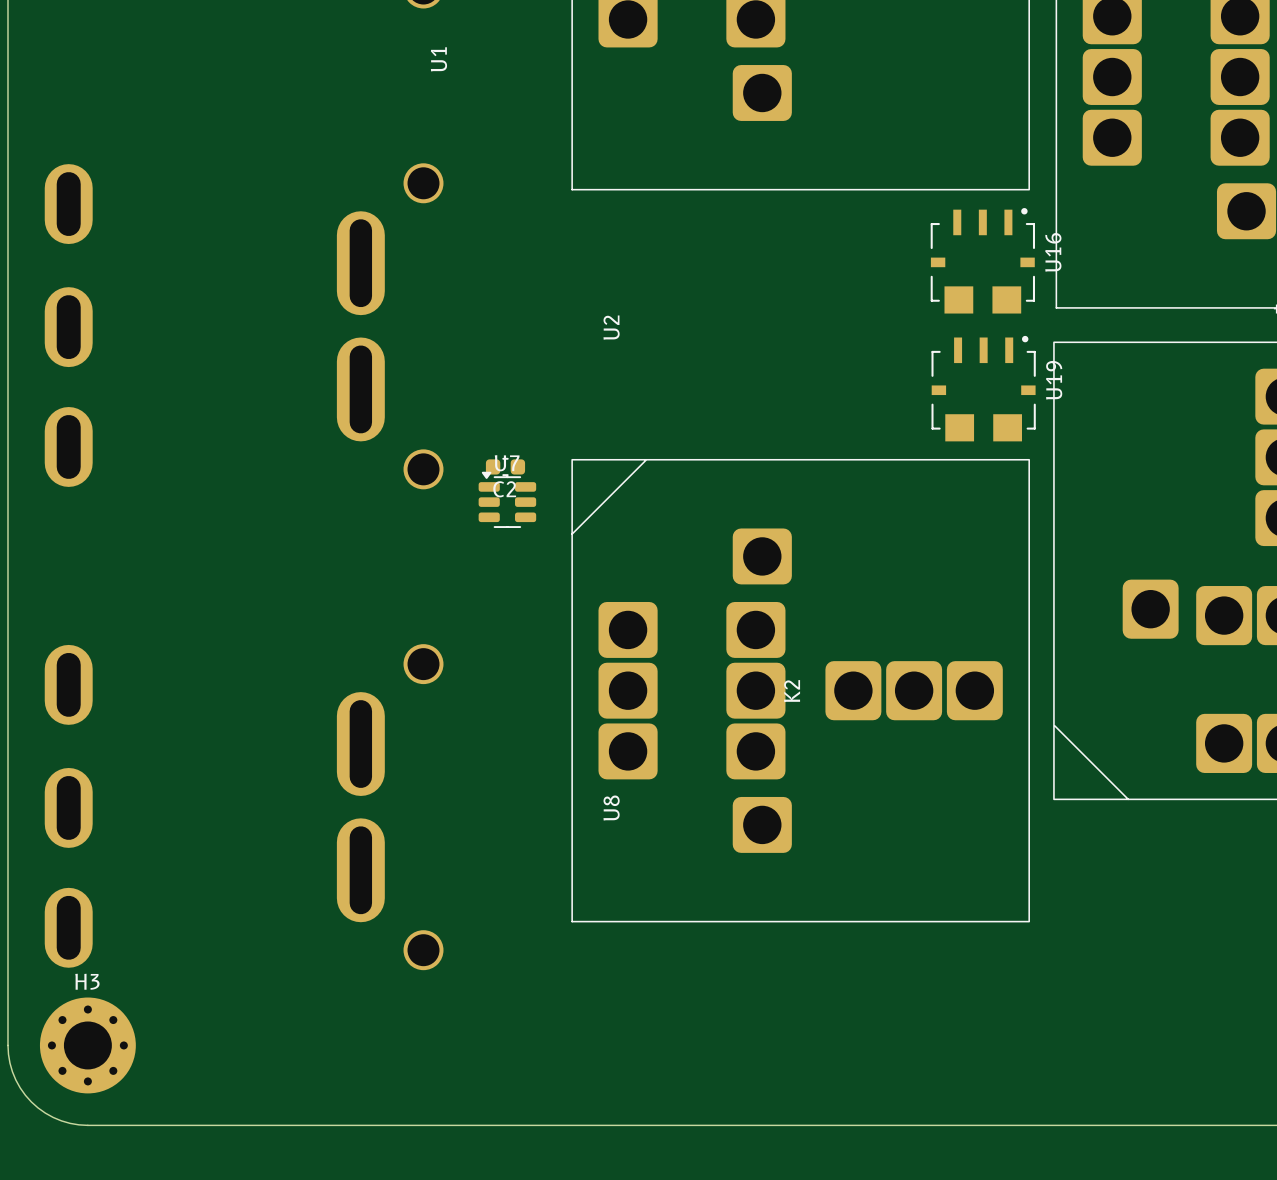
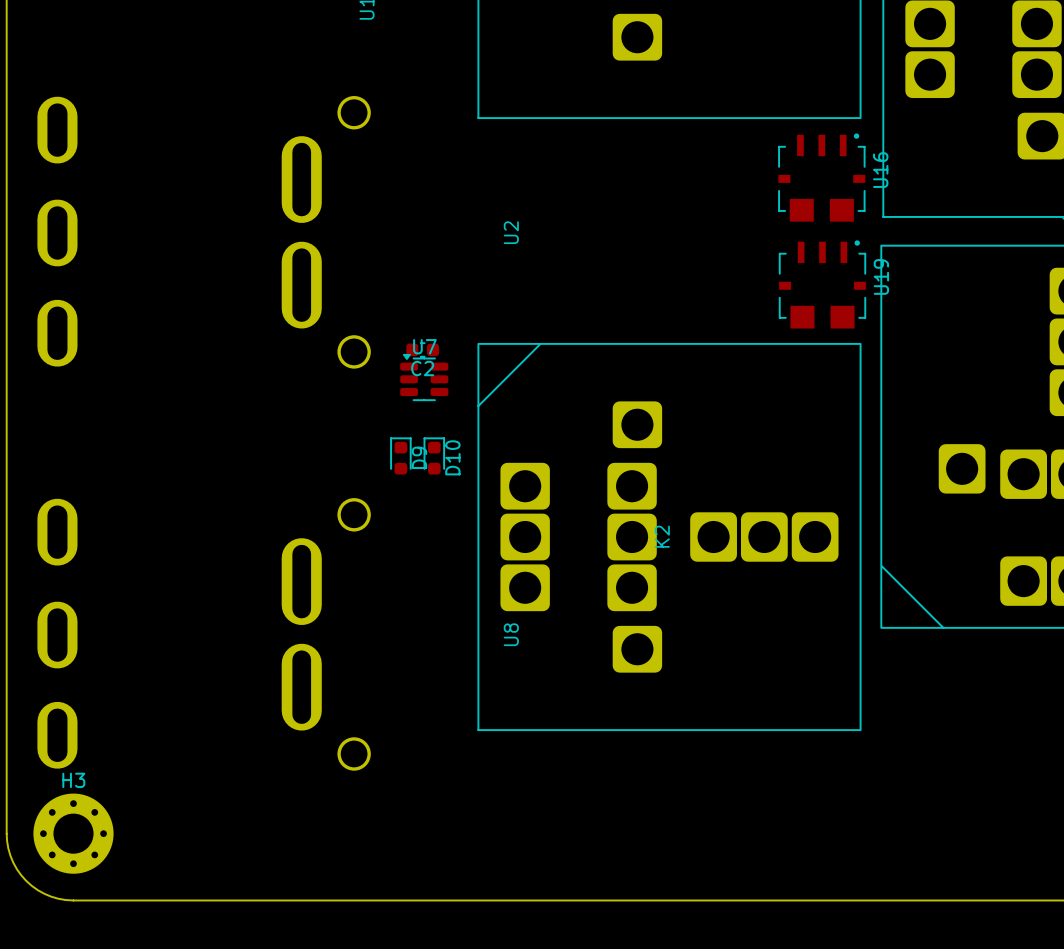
D9: none -> (400, 456)
D10: none -> (434, 456)

